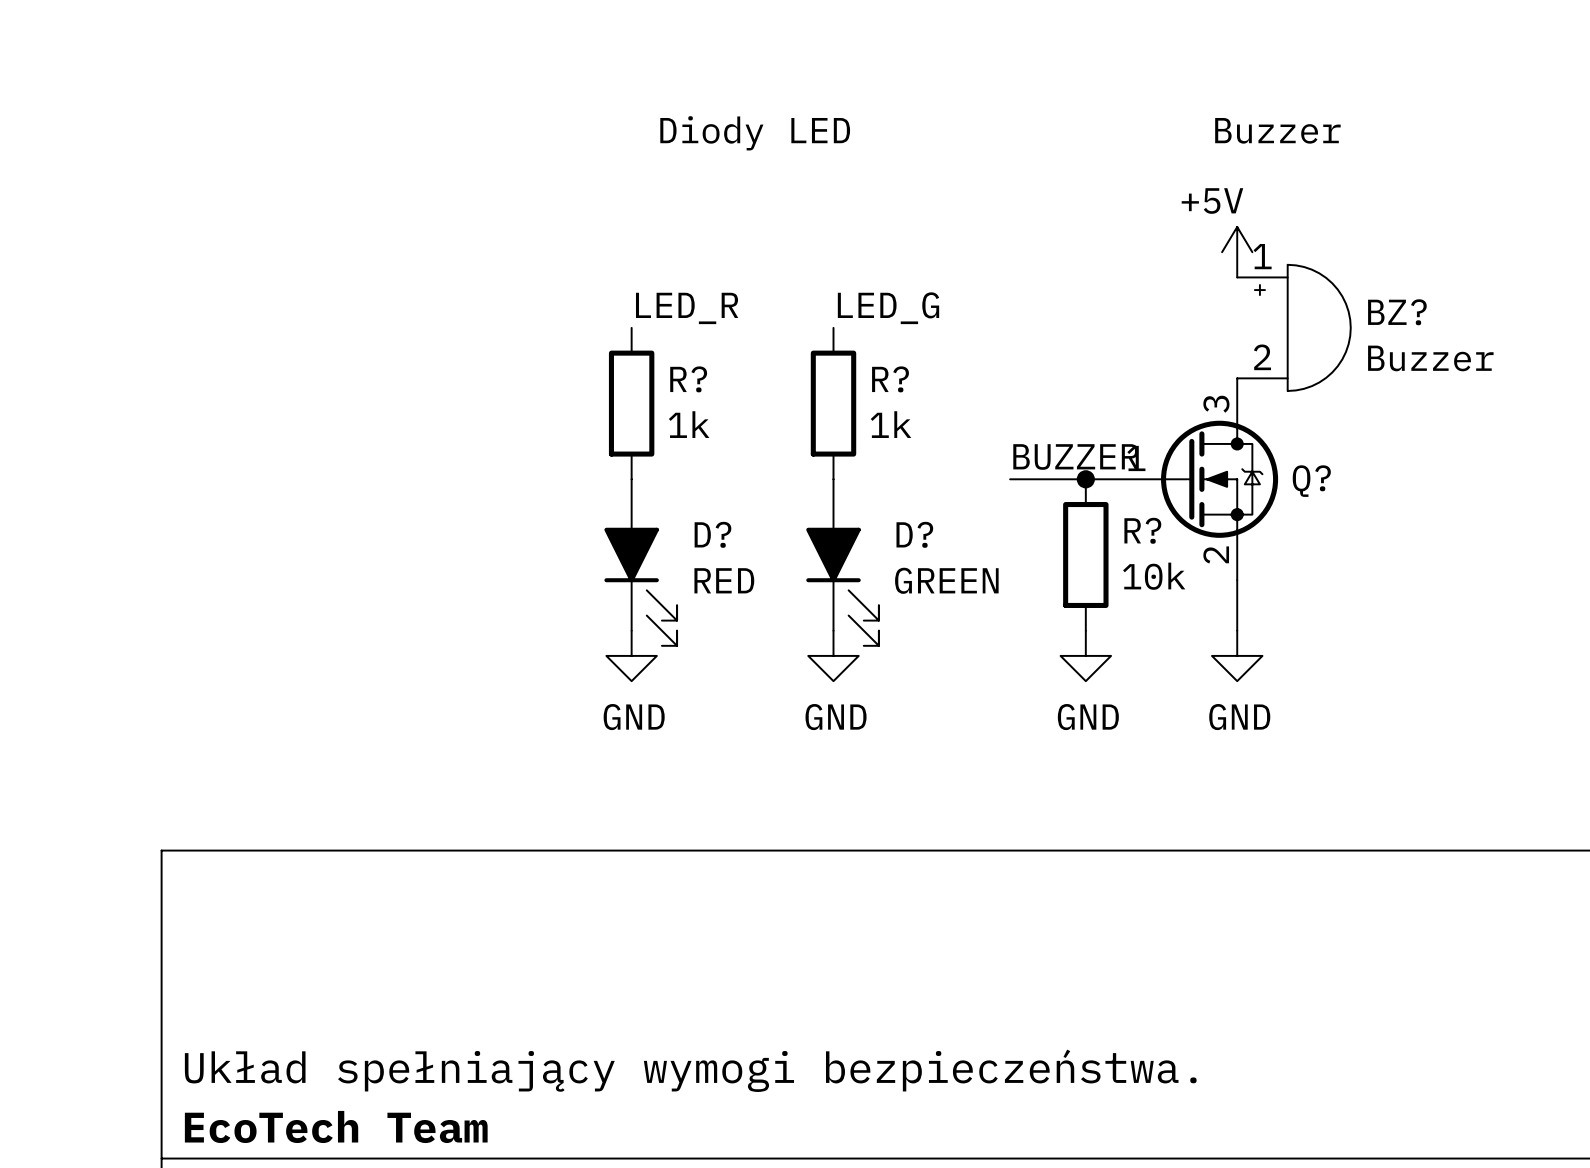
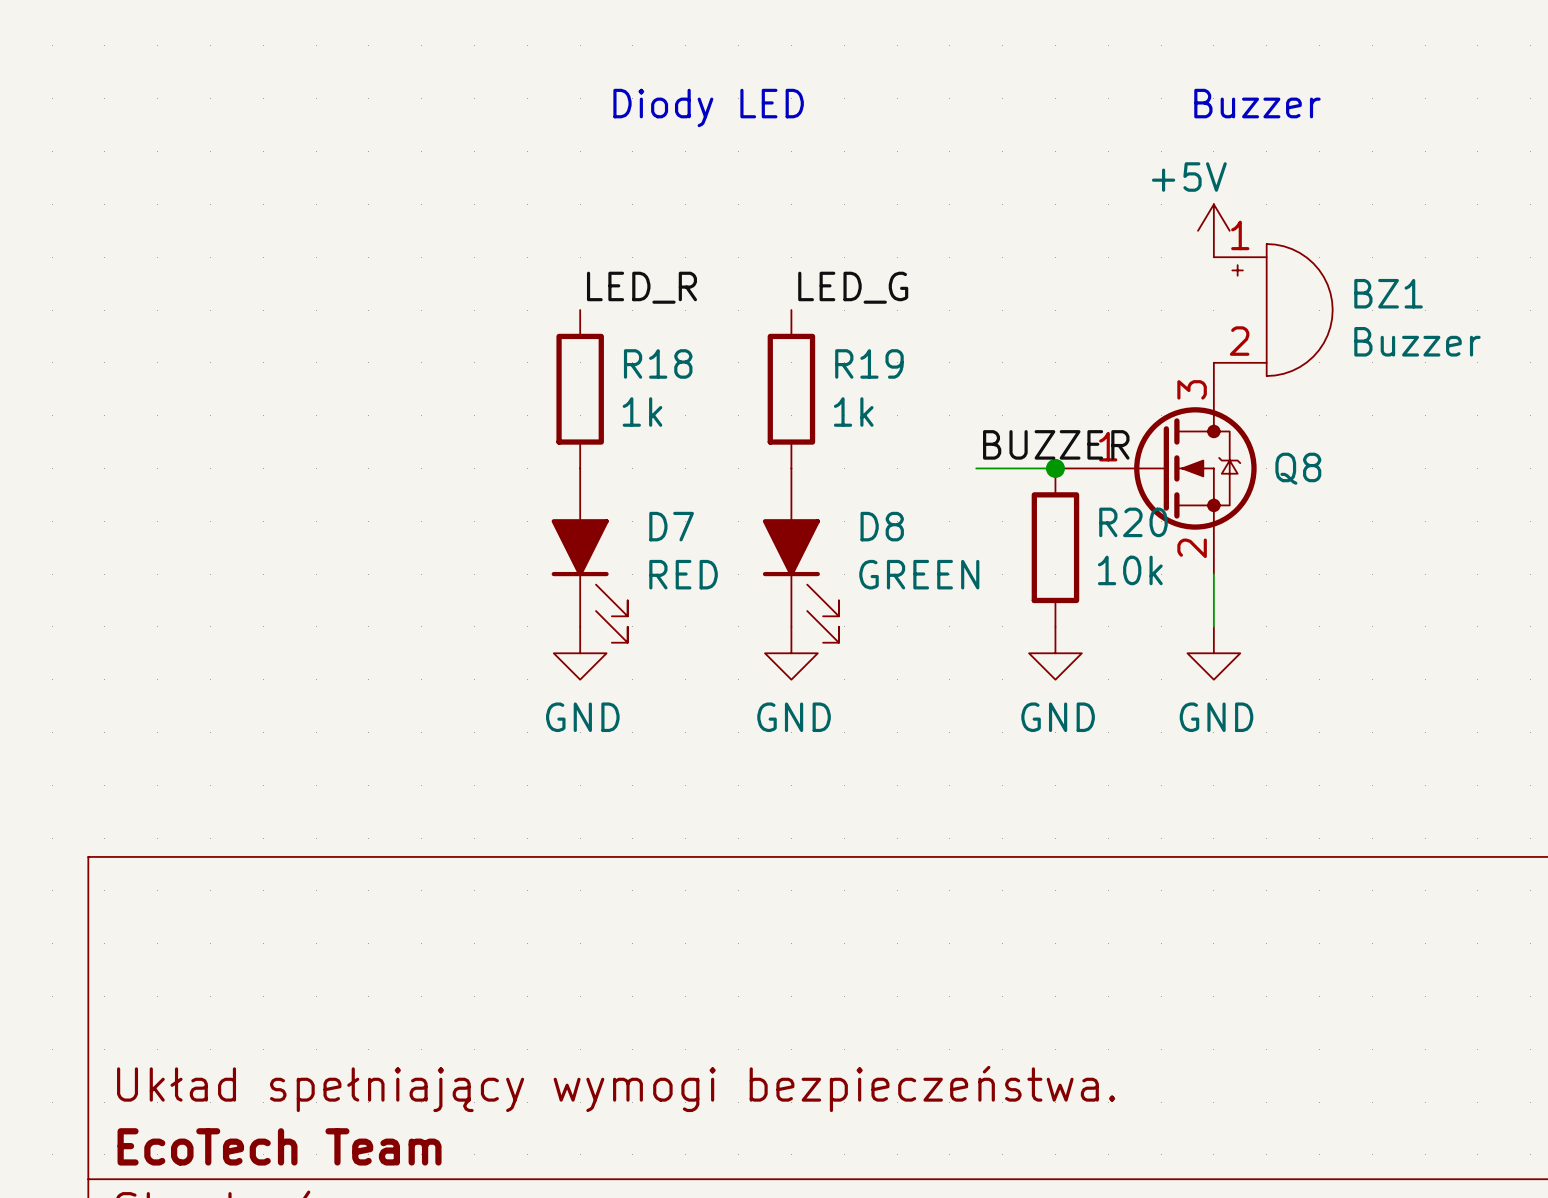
BZ? name: BZ? (1397, 312) -> BZ1 (1388, 293)
R? name: R? (688, 379) -> R18 (658, 363)
R? name: R? (890, 379) -> R19 (869, 363)
Q? name: Q? (1311, 481) -> Q8 (1298, 468)
R? name: R? (1142, 530) -> R20 (1133, 522)
D? name: D? (712, 534) -> D7 (671, 526)
D? name: D? (914, 534) -> D8 (882, 526)

